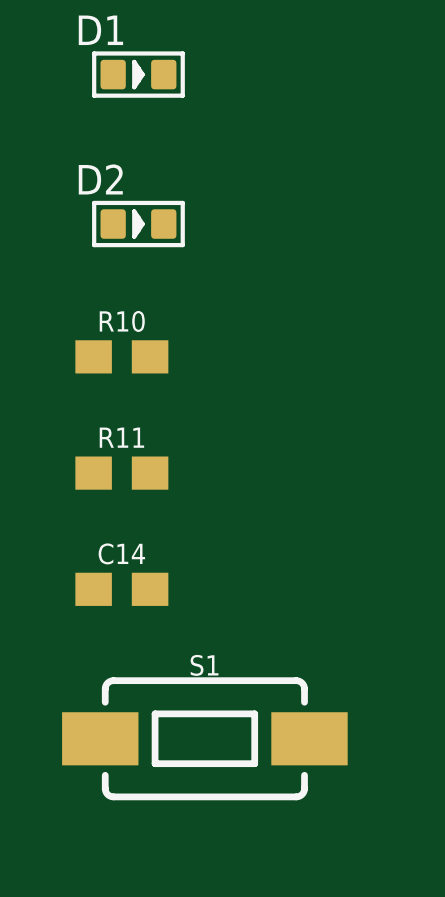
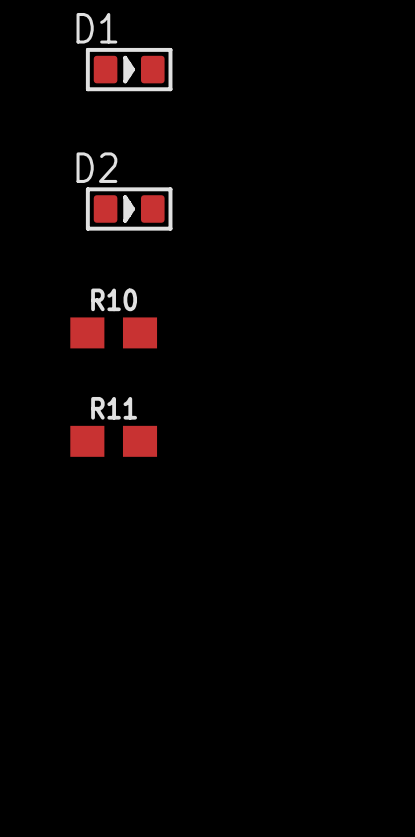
C14: (121, 589) -> none
S1: (204, 738) -> none

